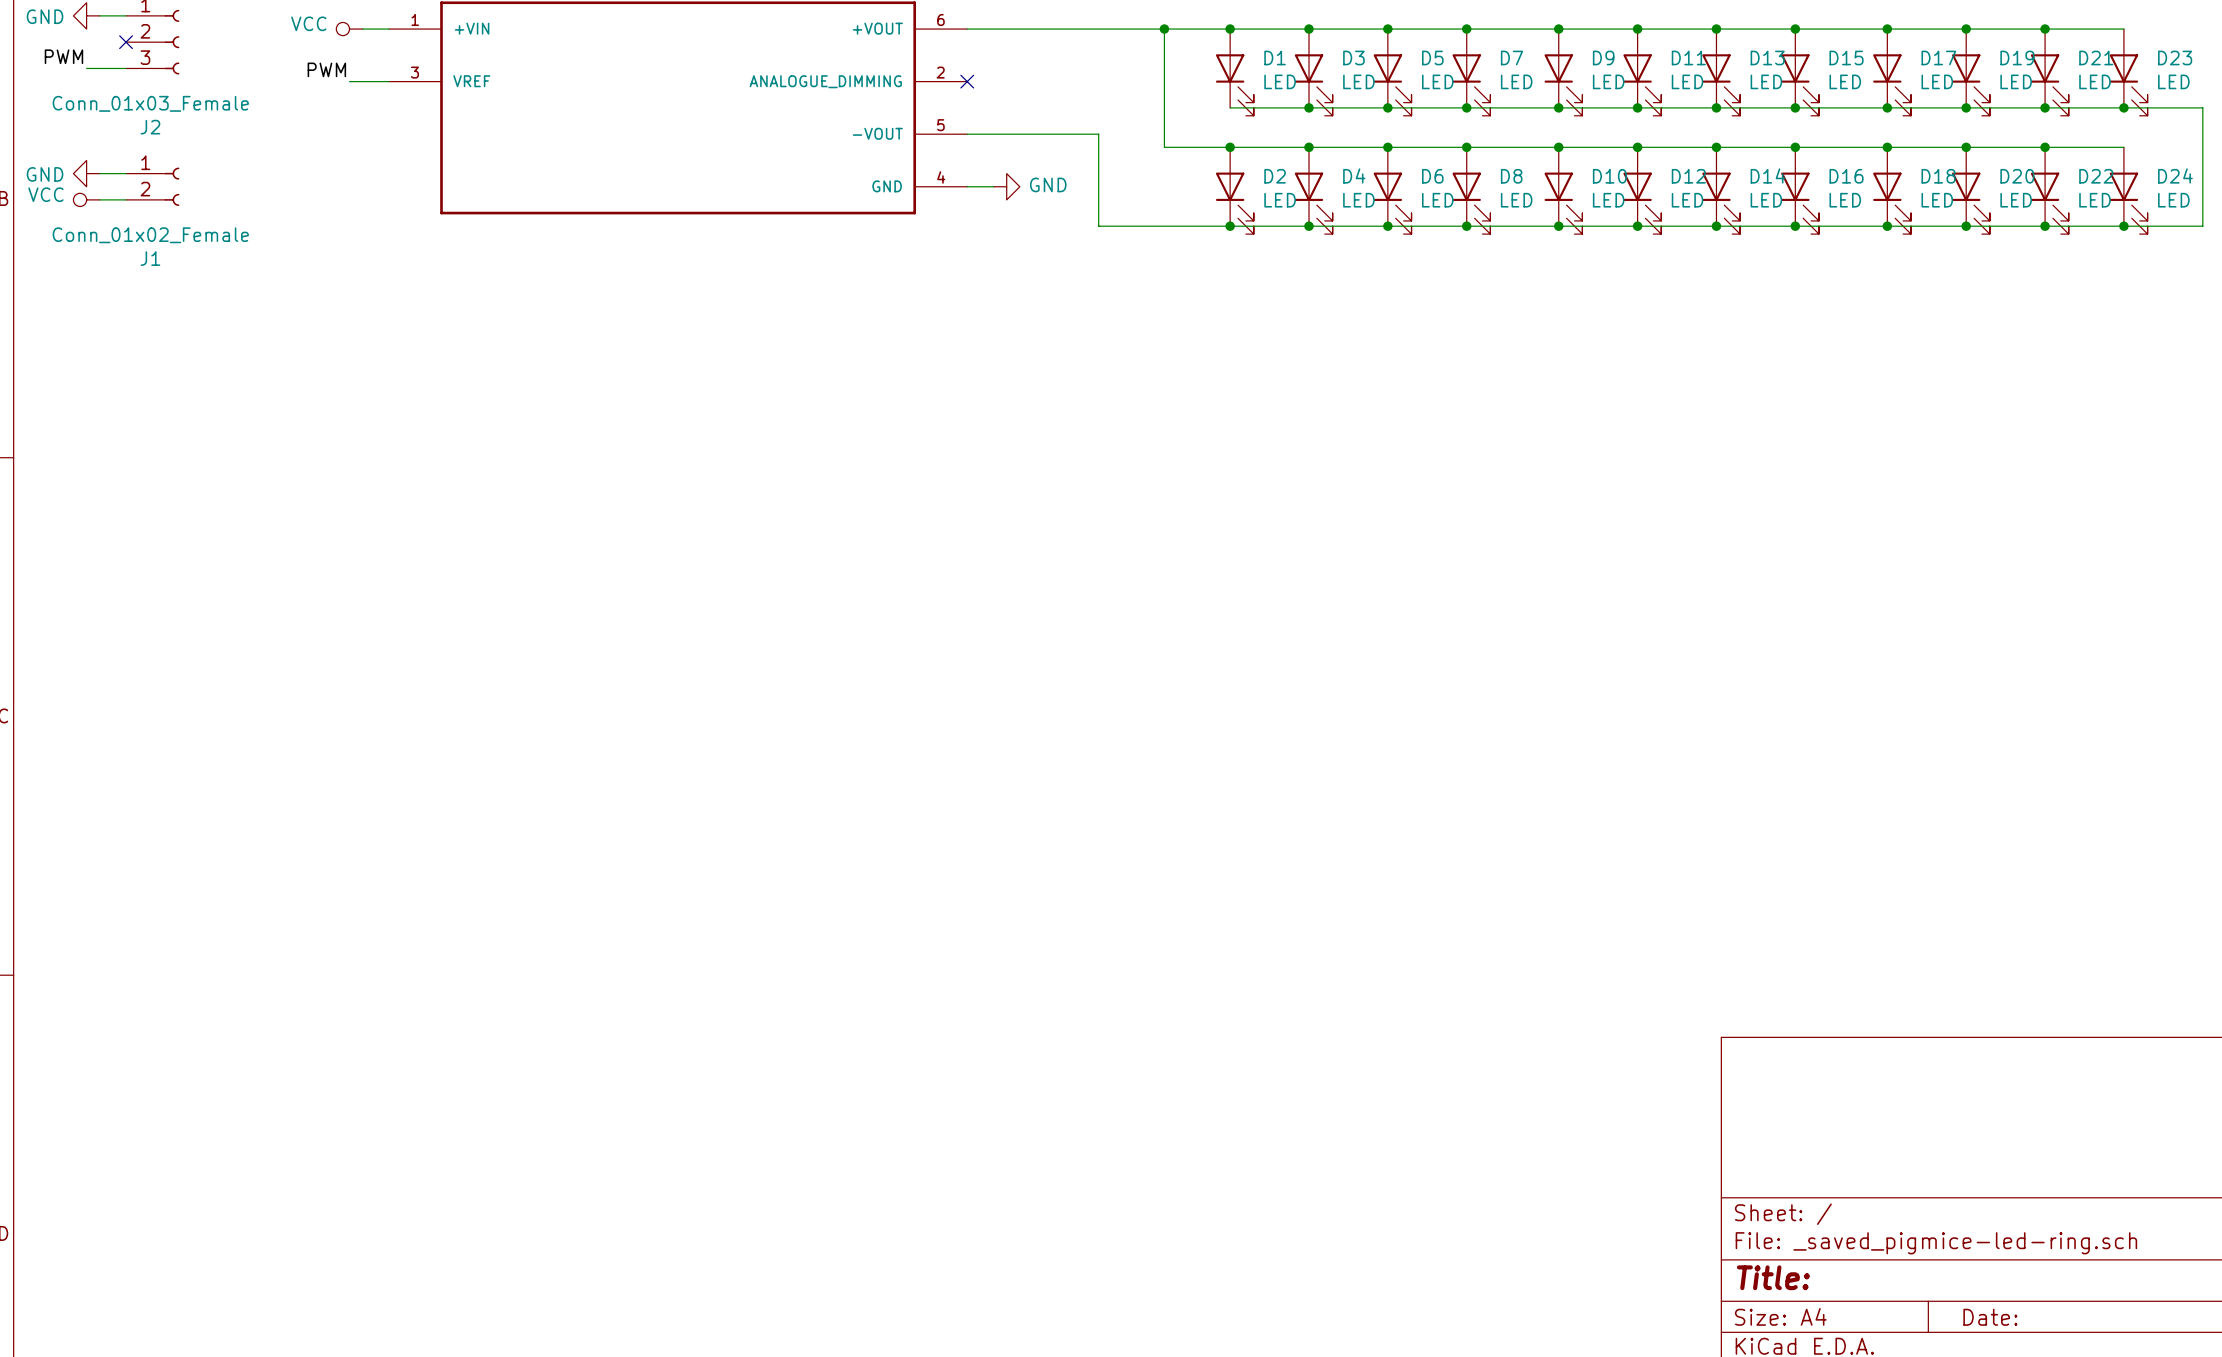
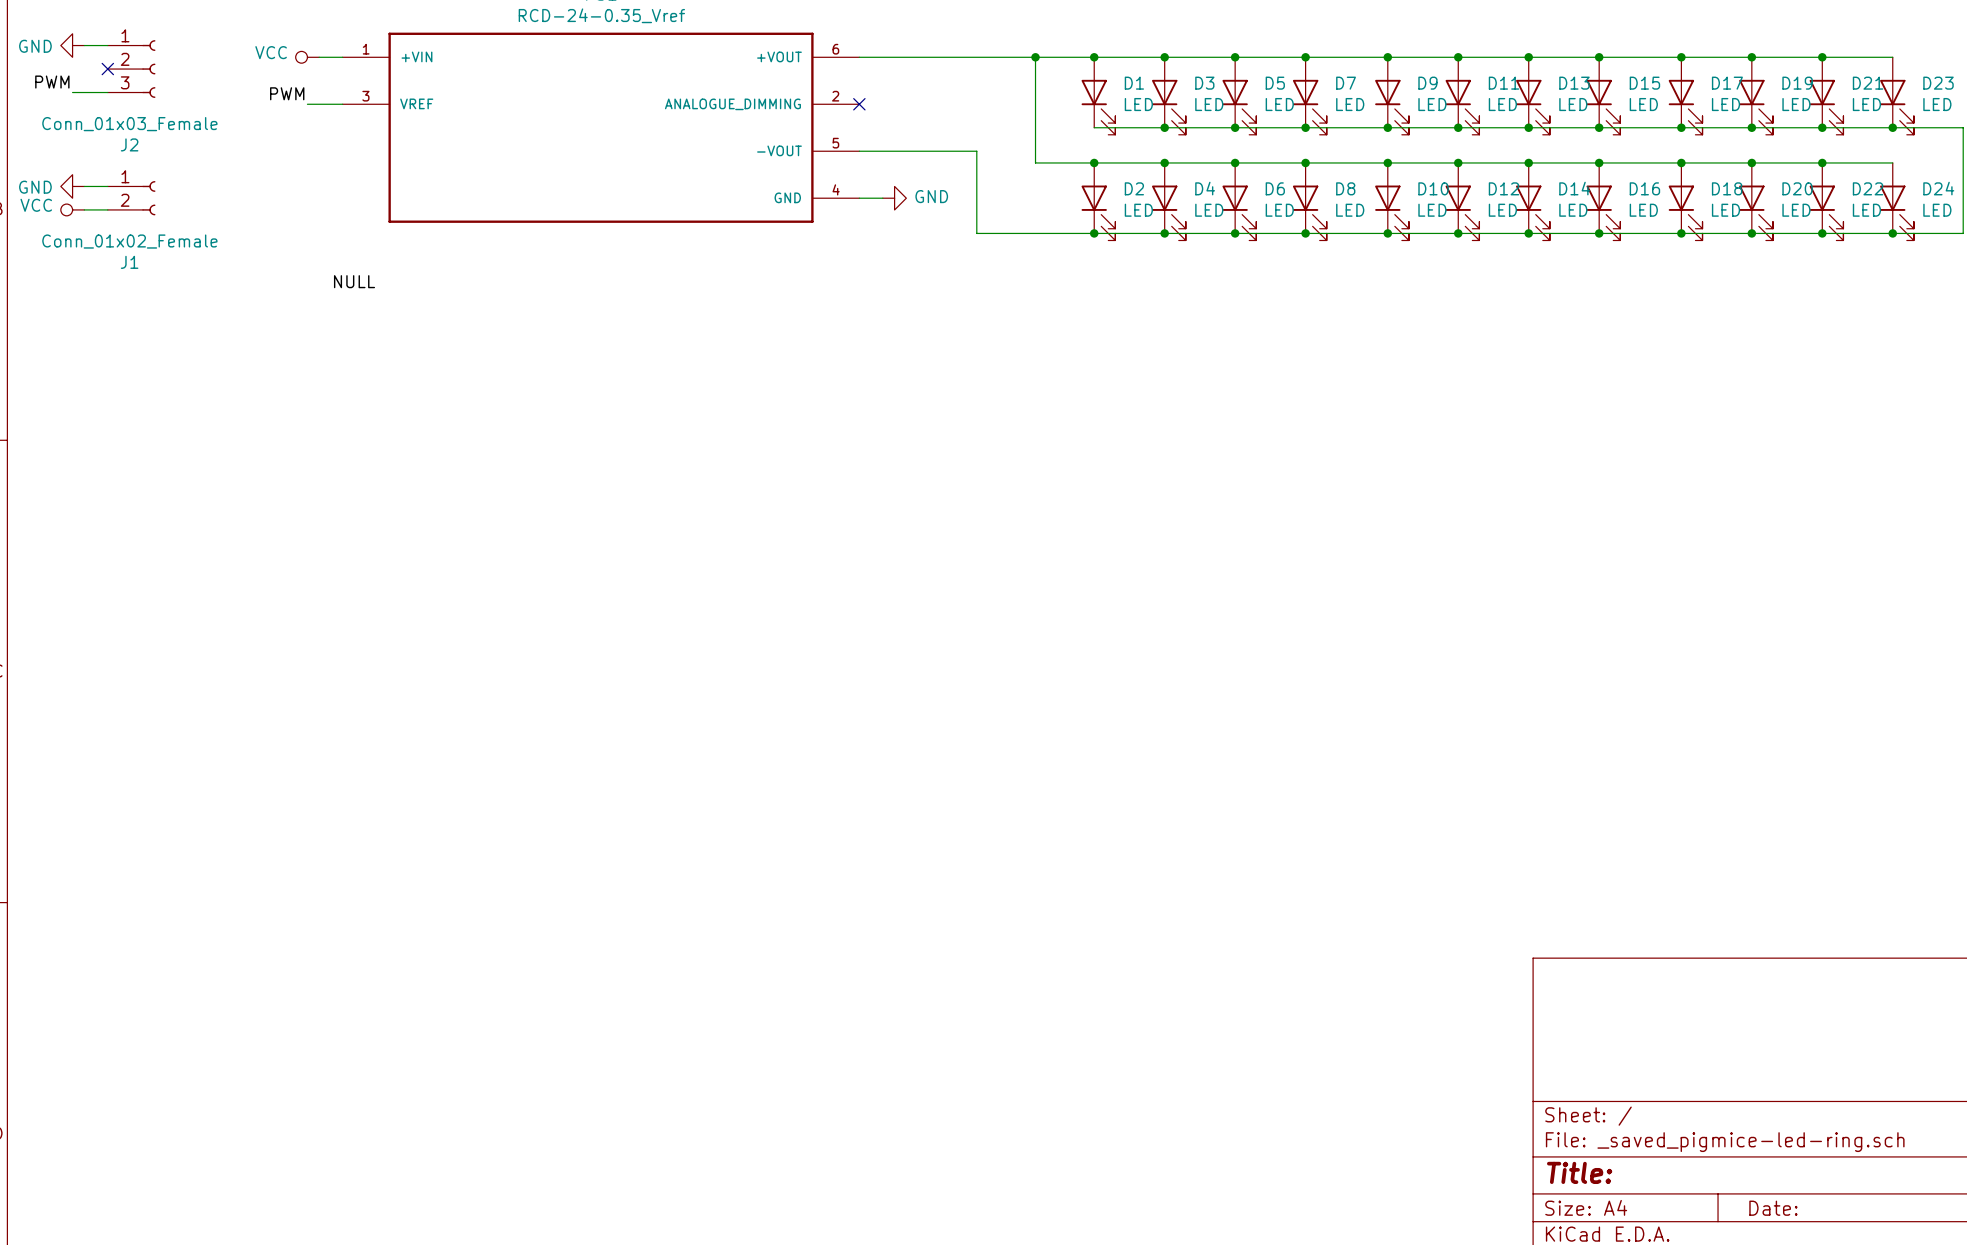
label: none -> NULL (354, 281)

